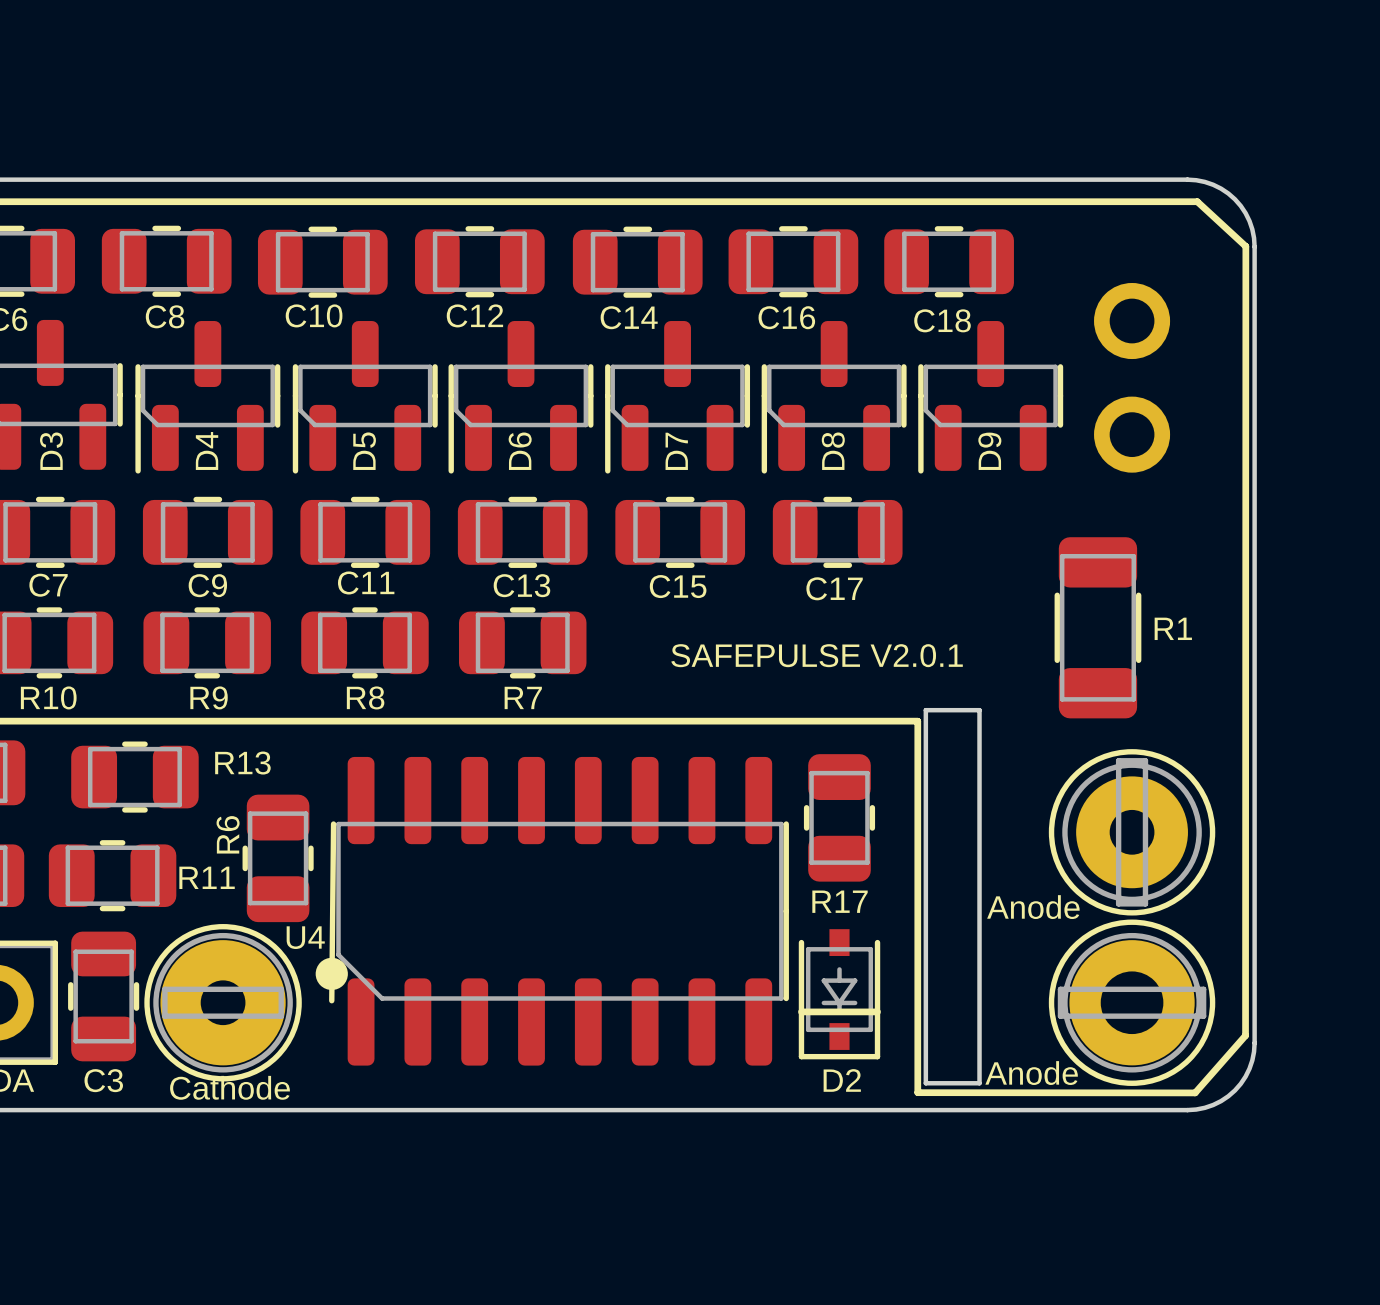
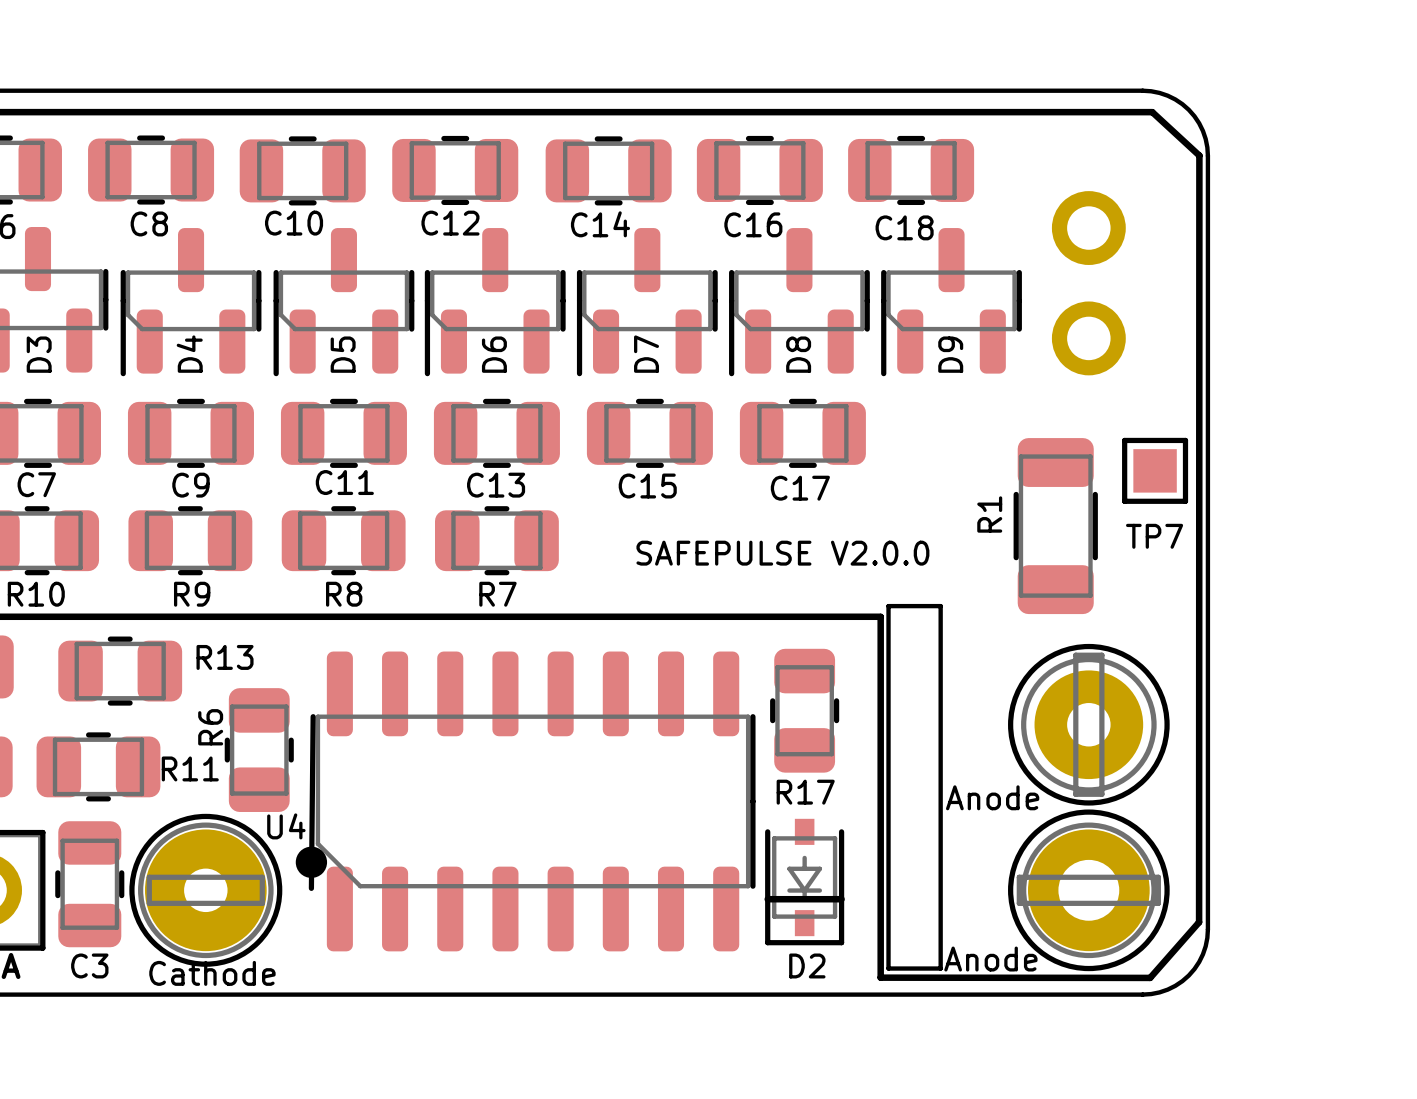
TP7: none -> (1155, 470)
R1 name rotation: 0° (1173, 628) -> 90° counterclockwise (989, 514)
R1 name position: R1 (1173, 628) -> R1 (989, 514)
text: SAFEPULSE V2.0.1 (817, 655) -> SAFEPULSE V2.0.0 (782, 553)

